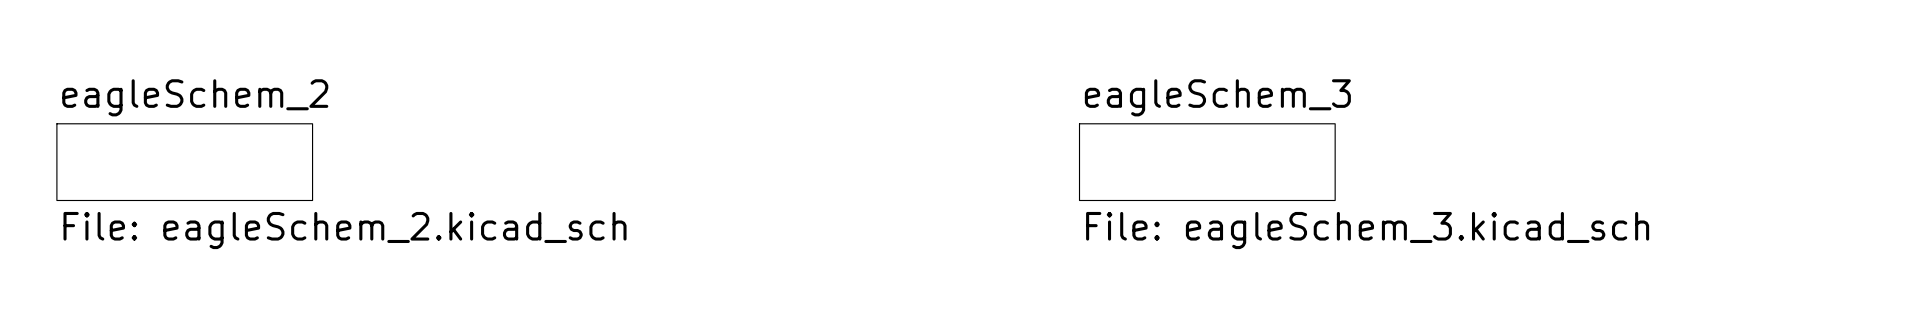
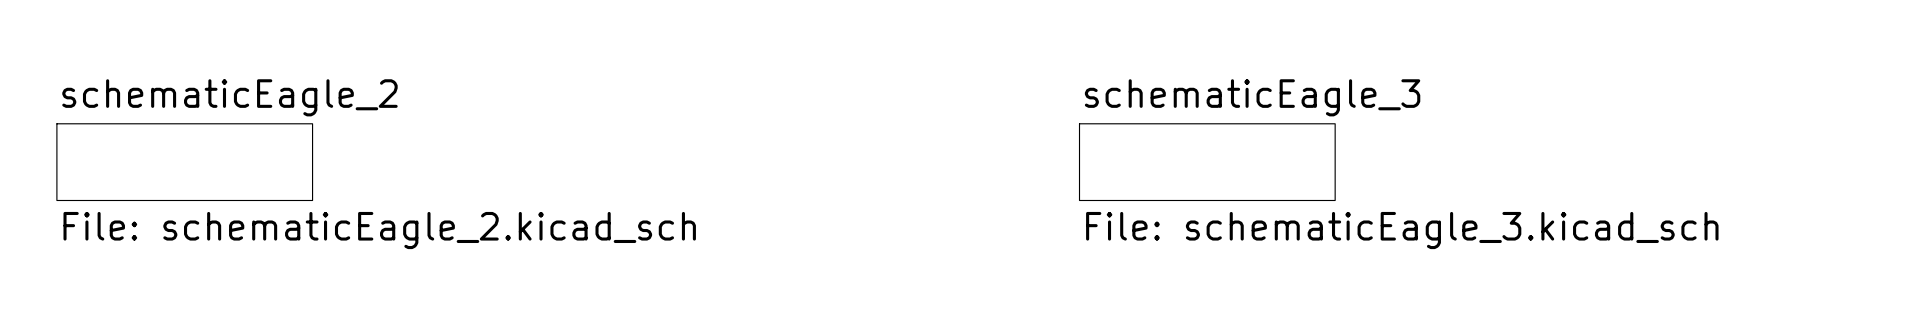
sheet eagleSchem_2 name: eagleSchem_2 (195, 97) -> schematicEagle_2 (229, 97)
sheet eagleSchem_3 name: eagleSchem_3 (1217, 97) -> schematicEagle_3 (1252, 97)
sheet eagleSchem_2 value: File: eagleSchem_2.kicad_sch (345, 230) -> File: schematicEagle_2.kicad_sch (379, 230)
sheet eagleSchem_3 value: File: eagleSchem_3.kicad_sch (1367, 230) -> File: schematicEagle_3.kicad_sch (1402, 230)

